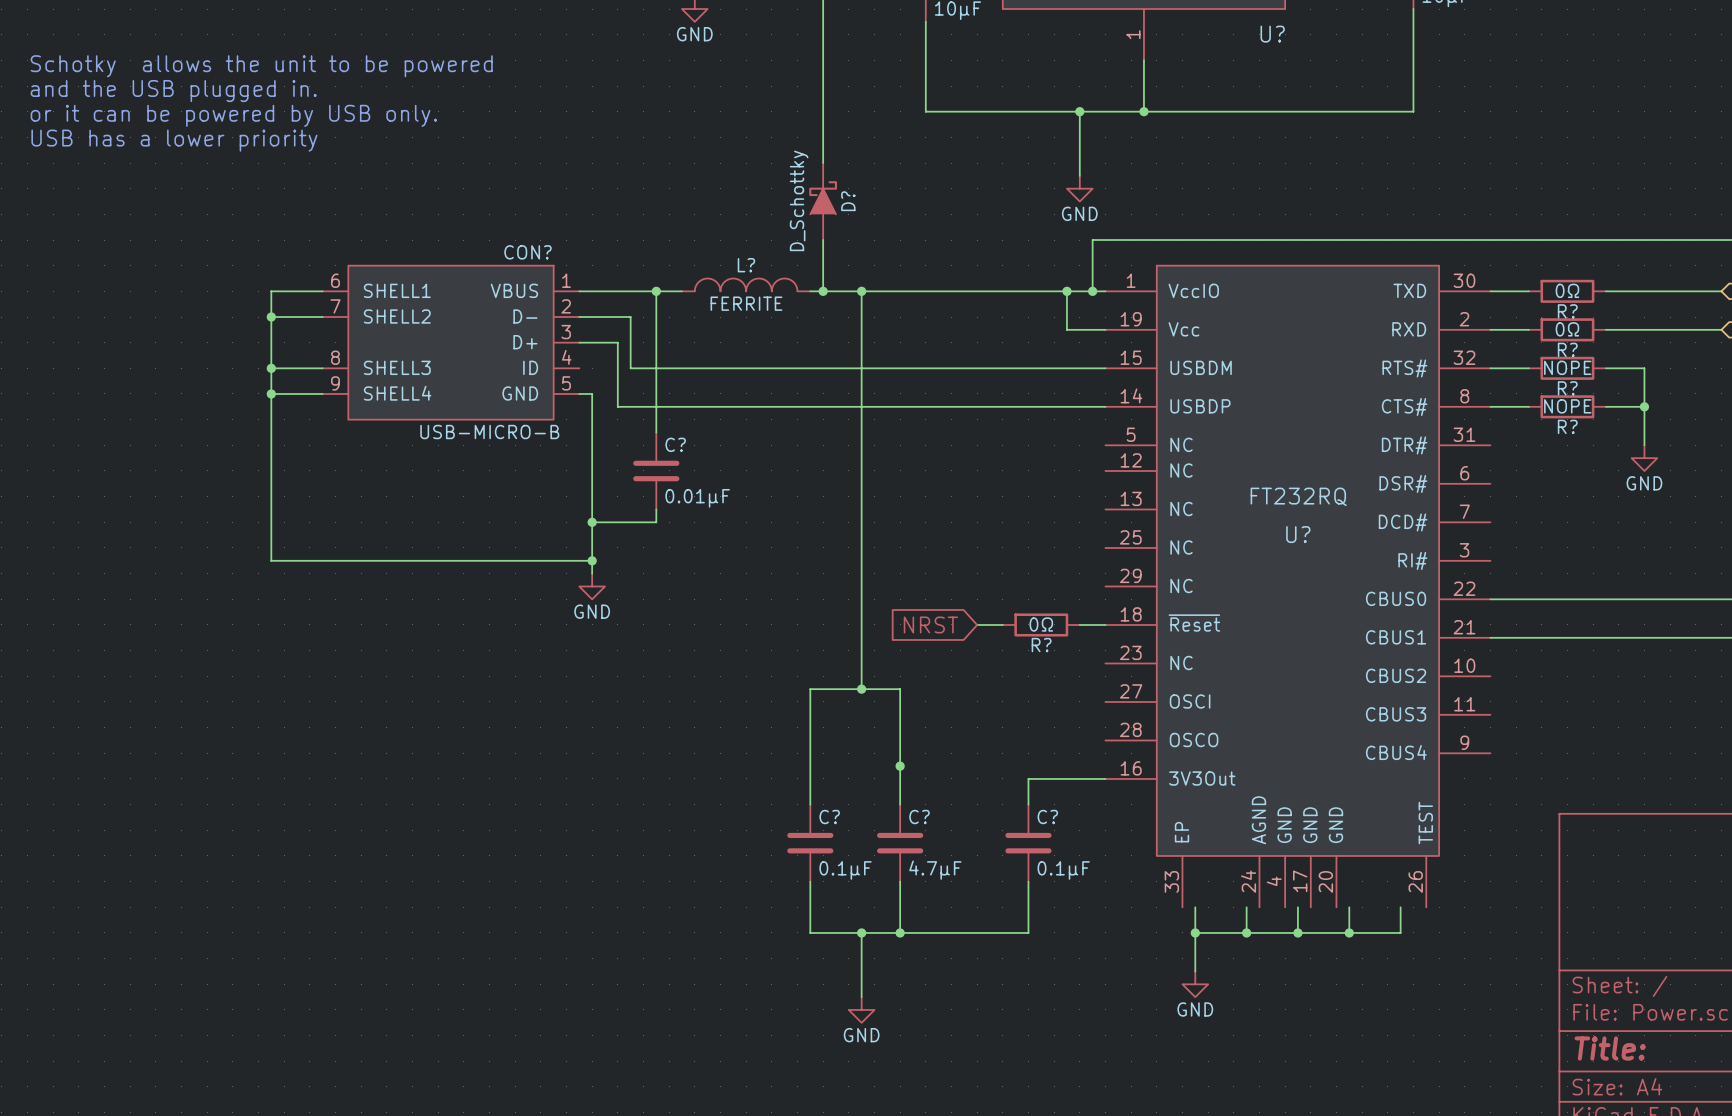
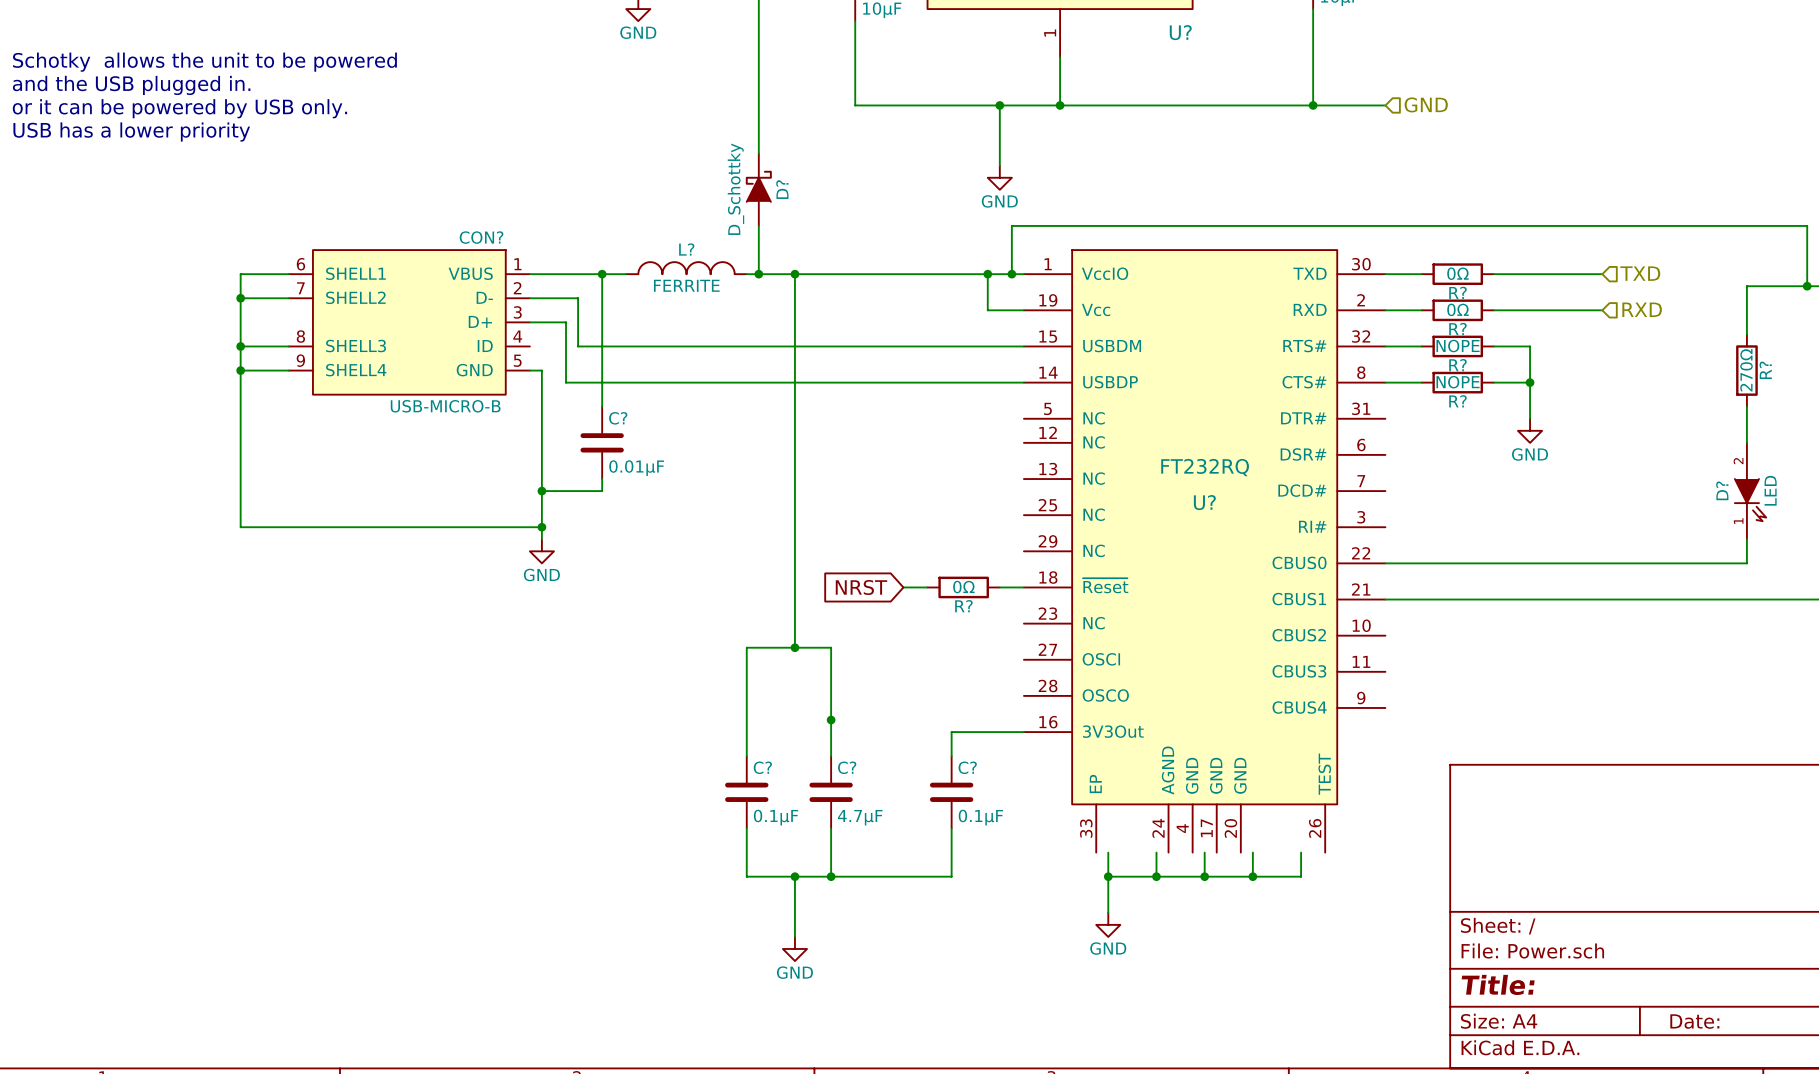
wire: none -> (1313, 105) (1385, 105)
junction: none -> (1313, 105)
hierarchical label: none -> GND (1426, 104)

